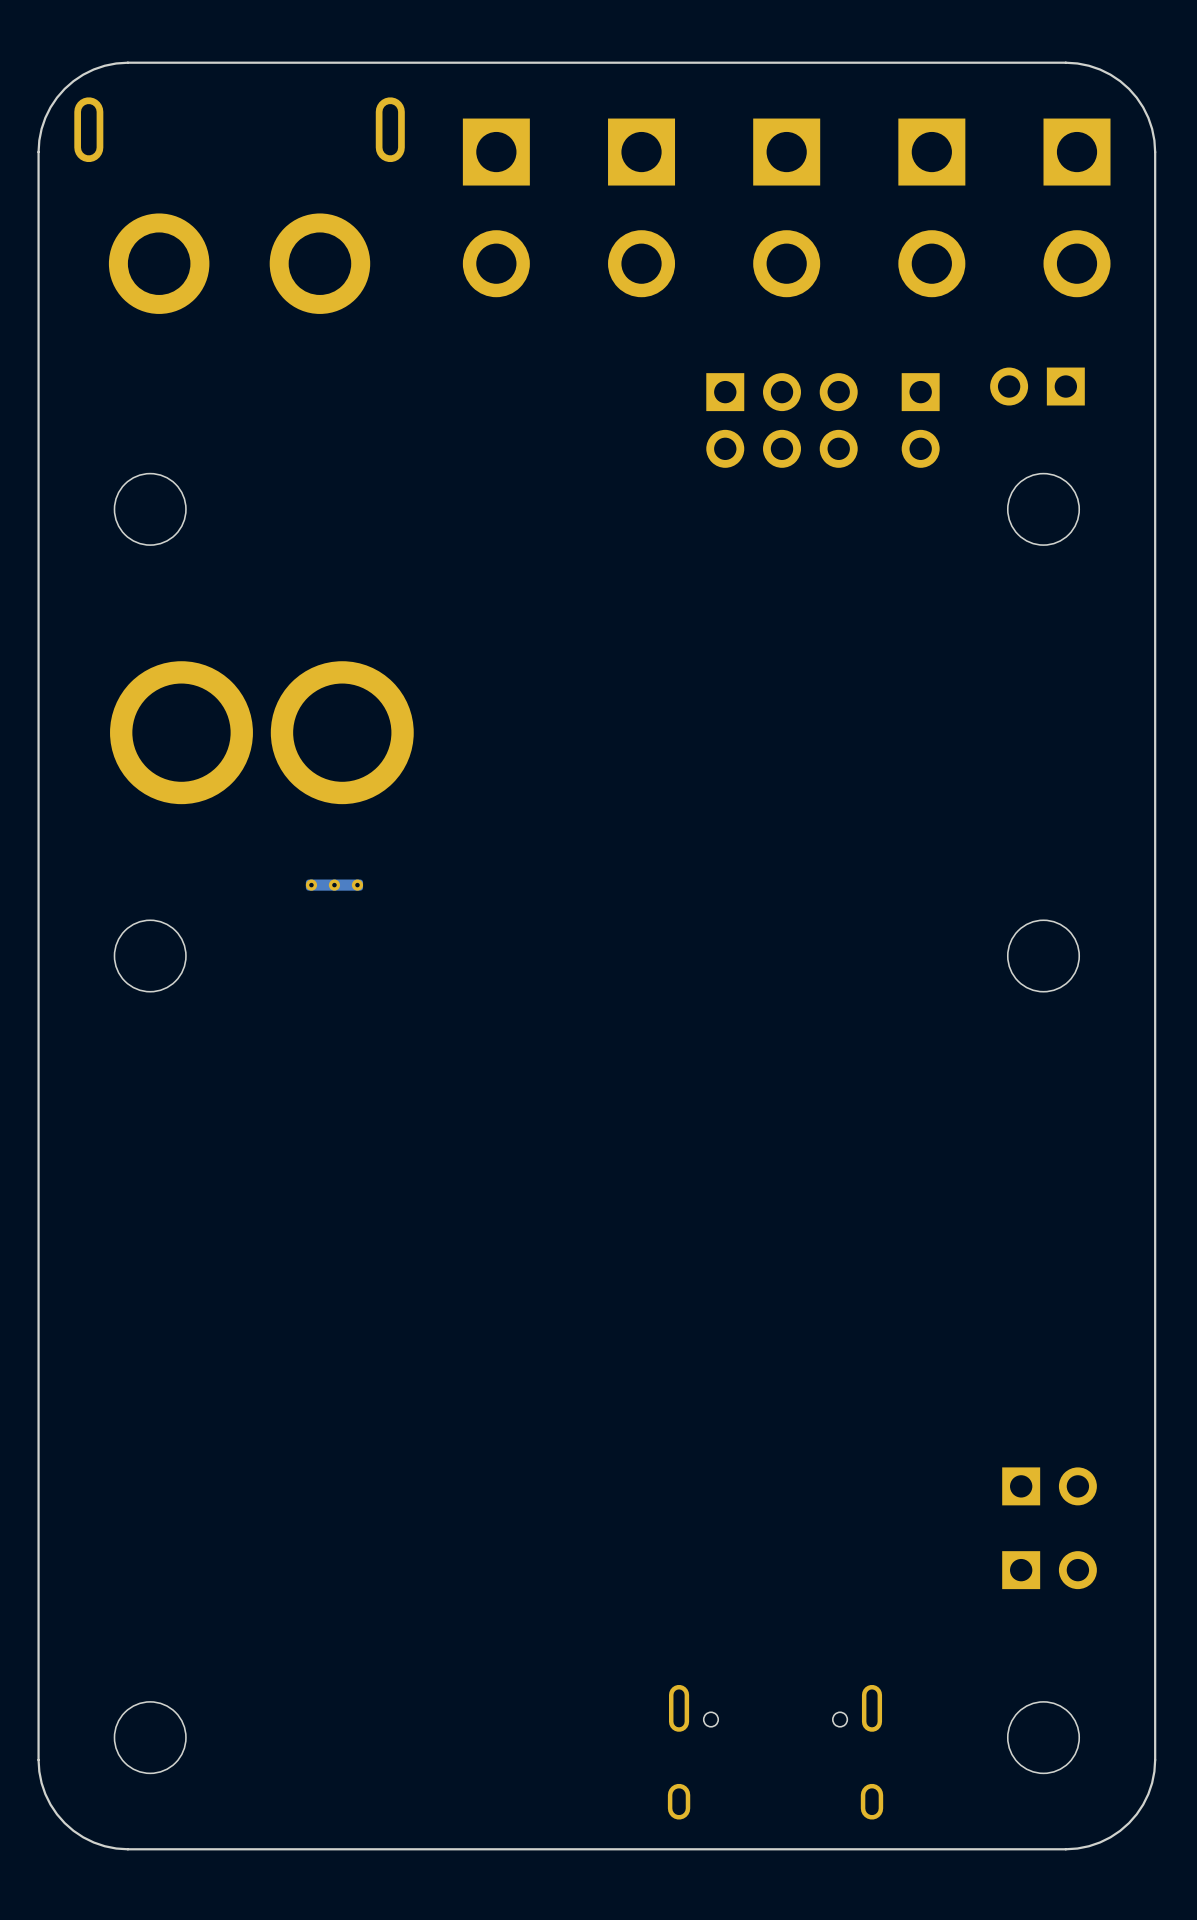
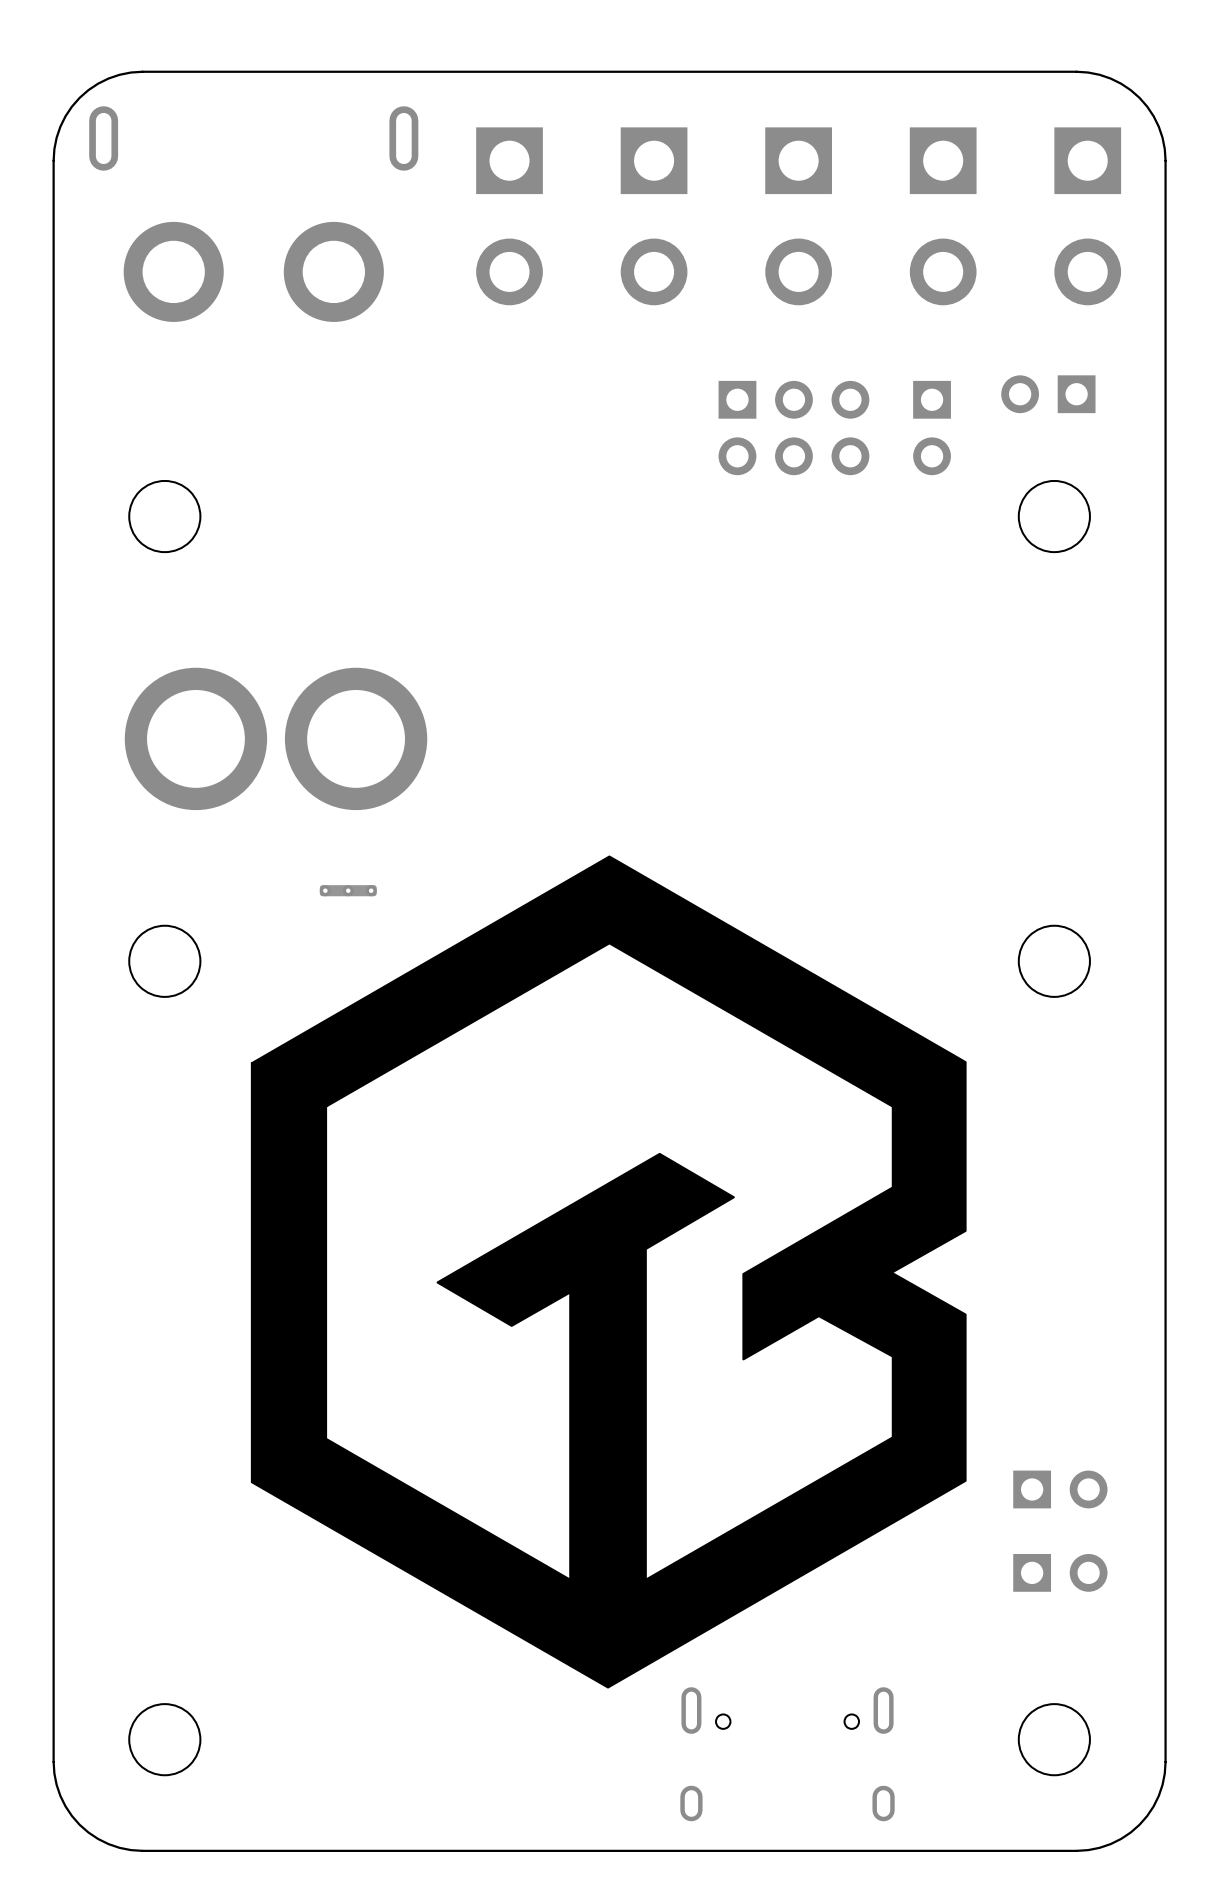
drawing: none -> [250, 855, 967, 1689]

